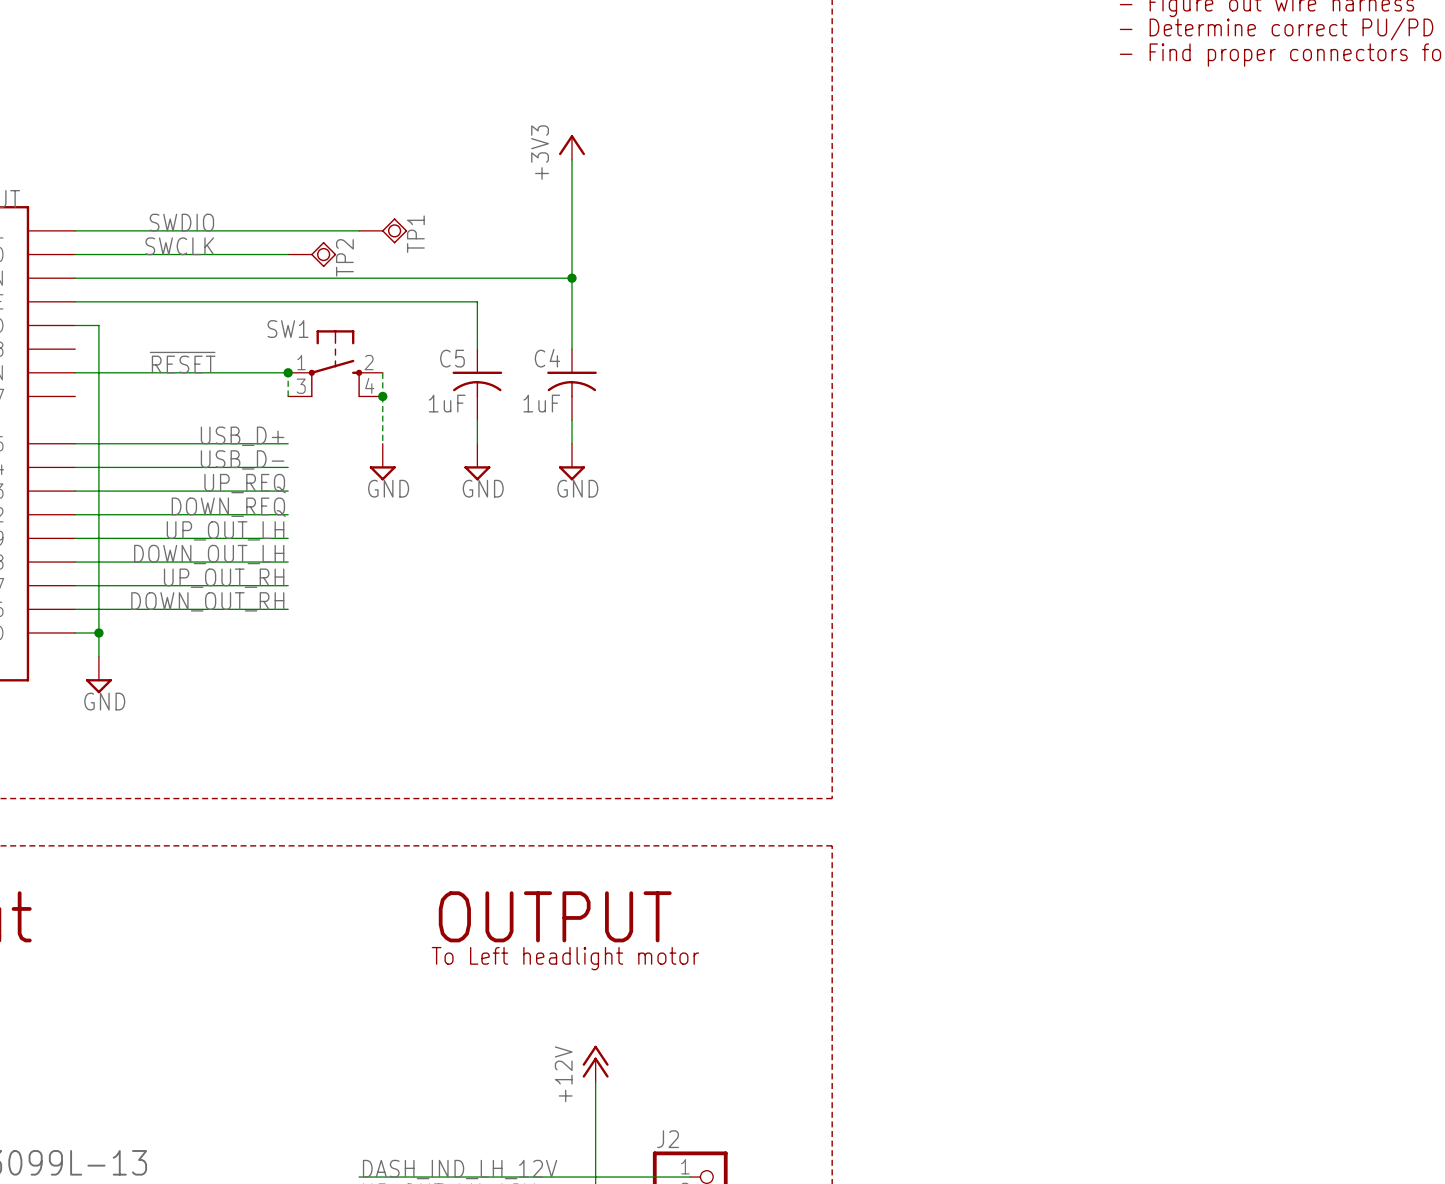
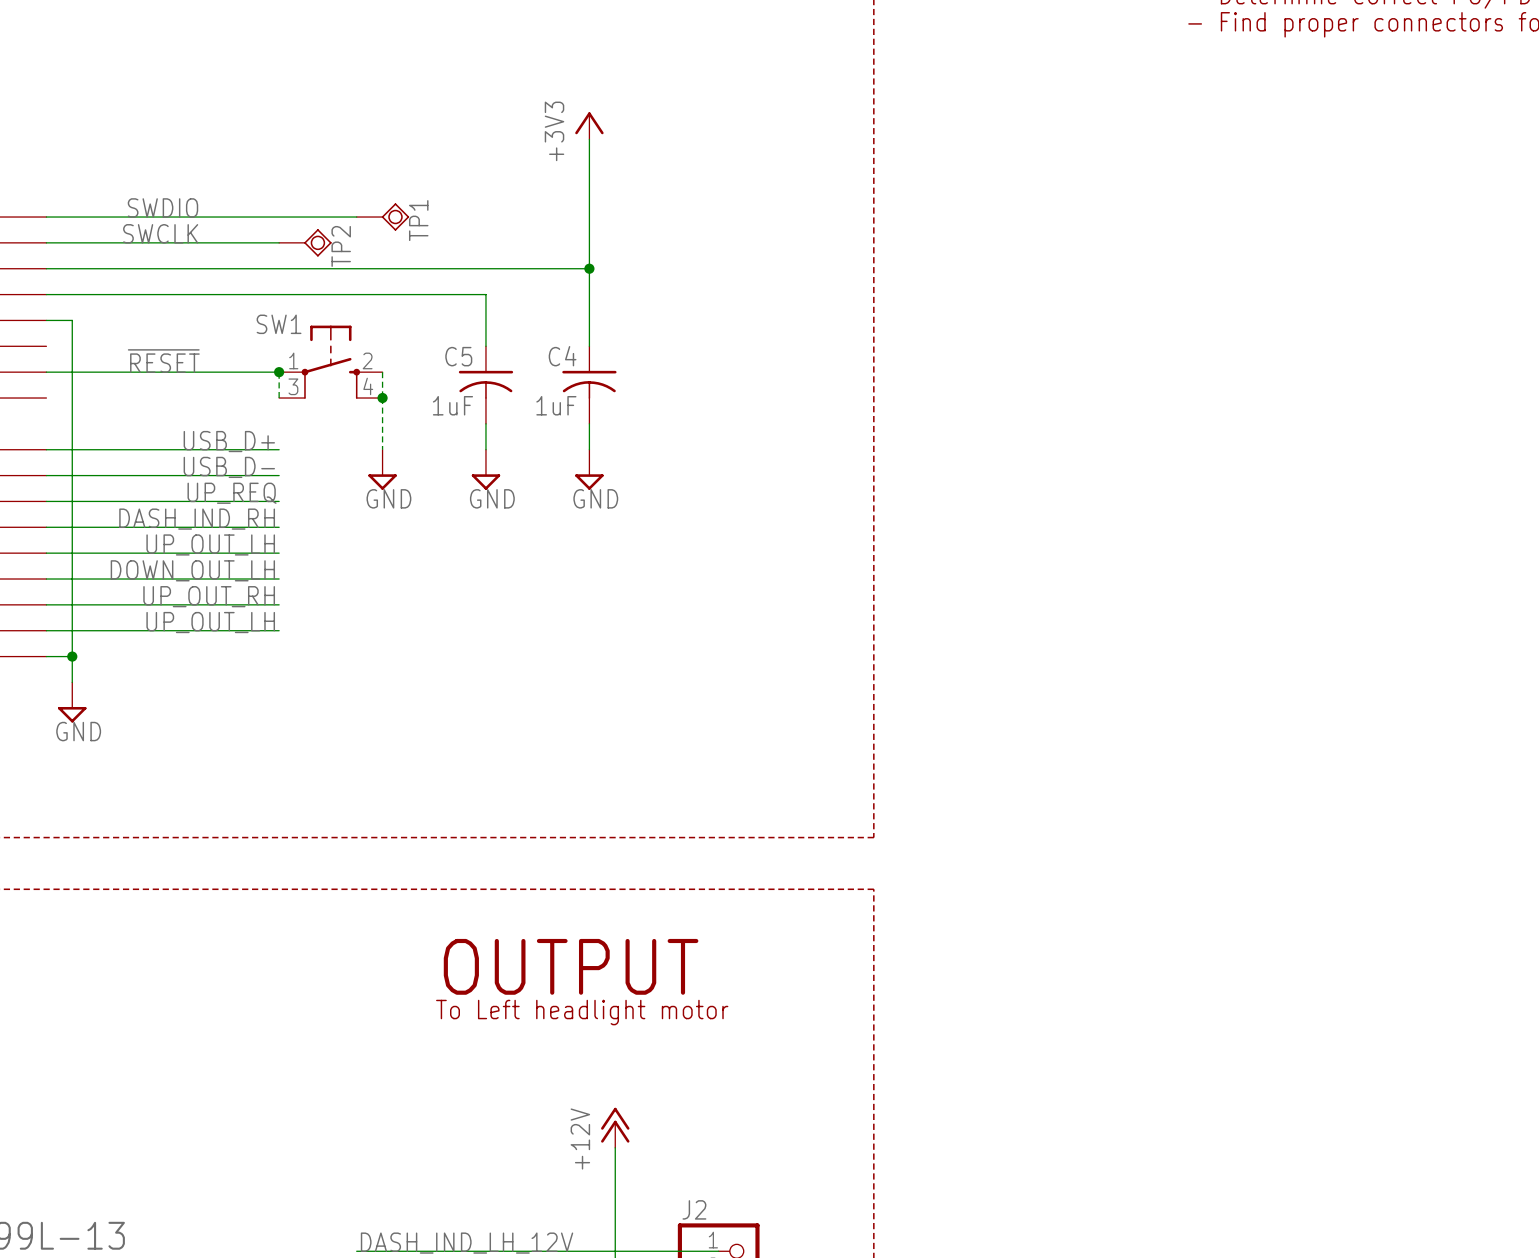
label: DOWN_REQ (228, 507) -> DASH_IND_RH (197, 519)
label: DOWN_OUT_RH (207, 601) -> UP_OUT_LH (210, 622)

